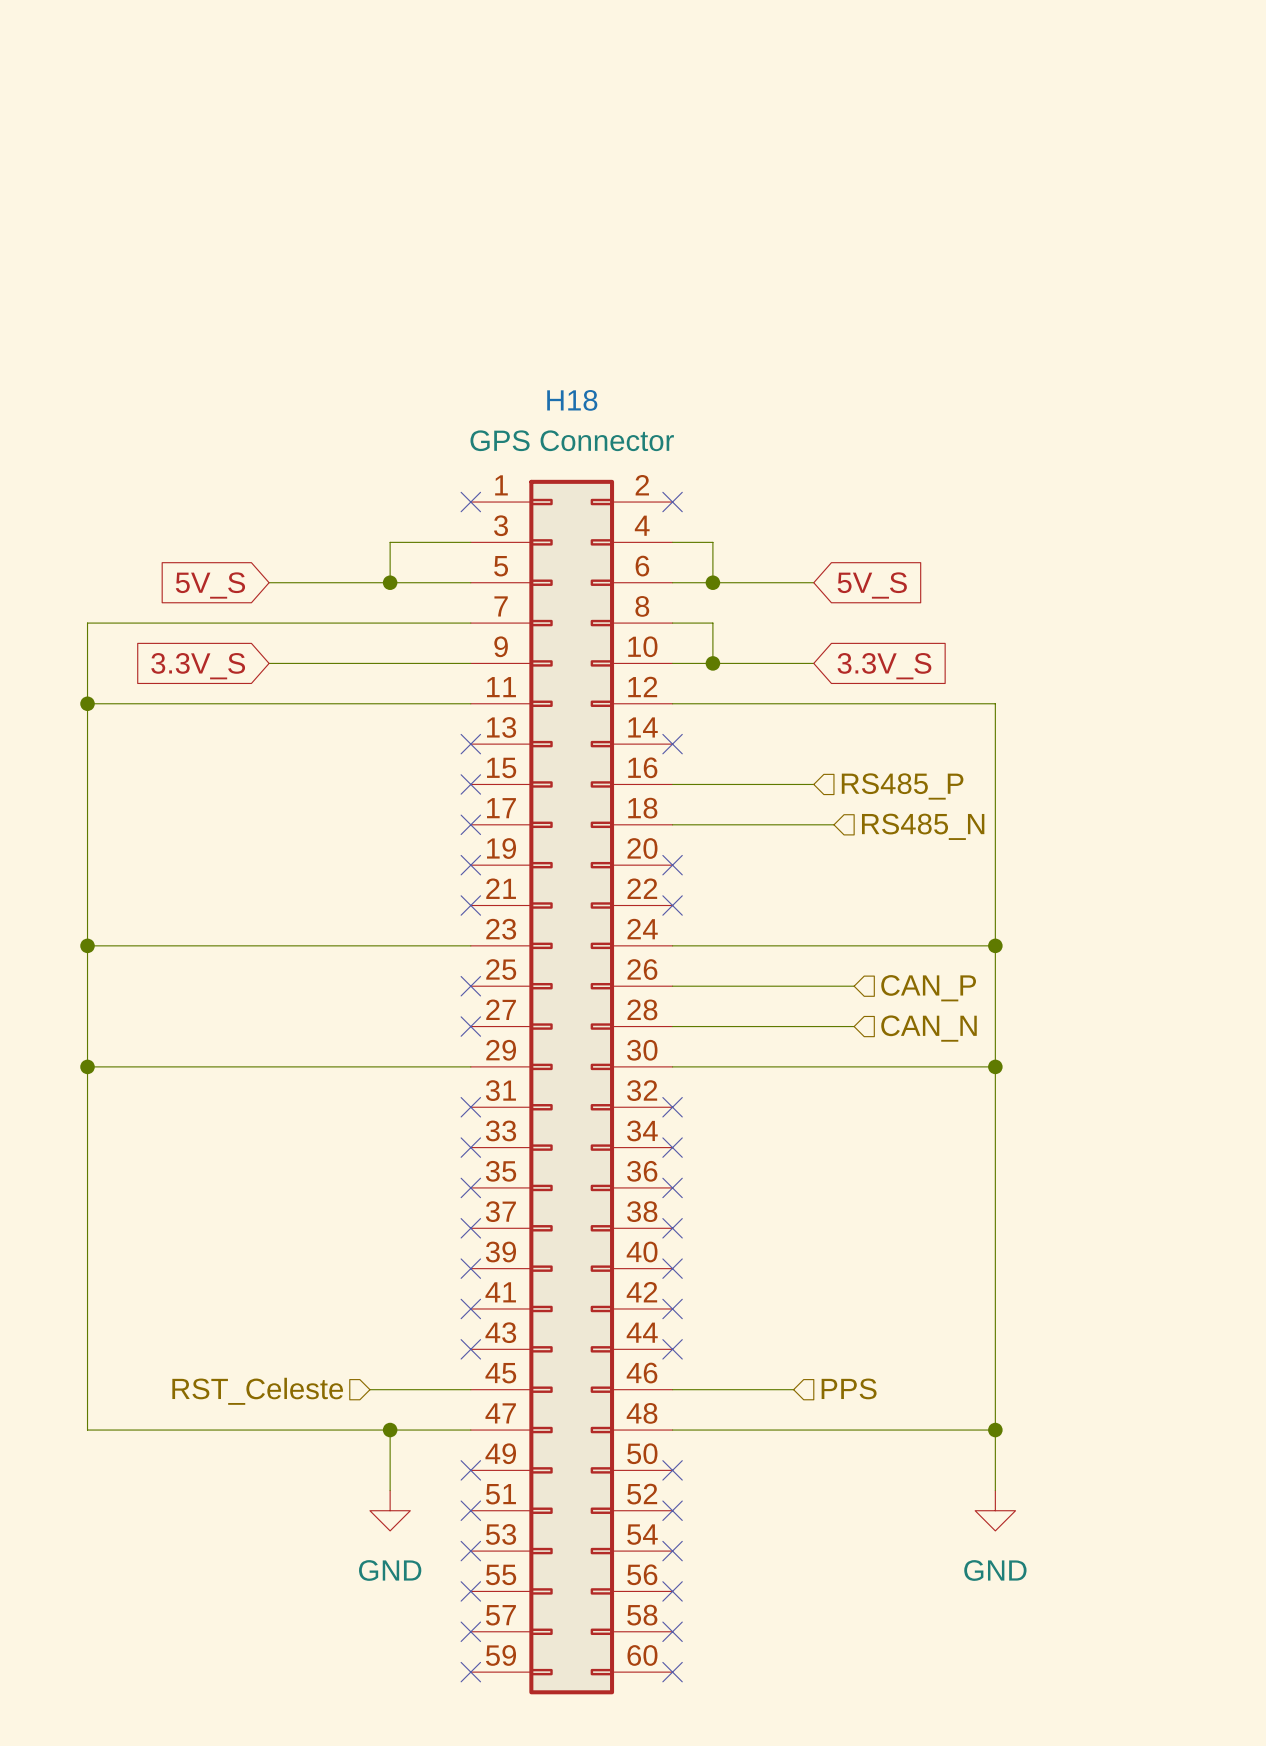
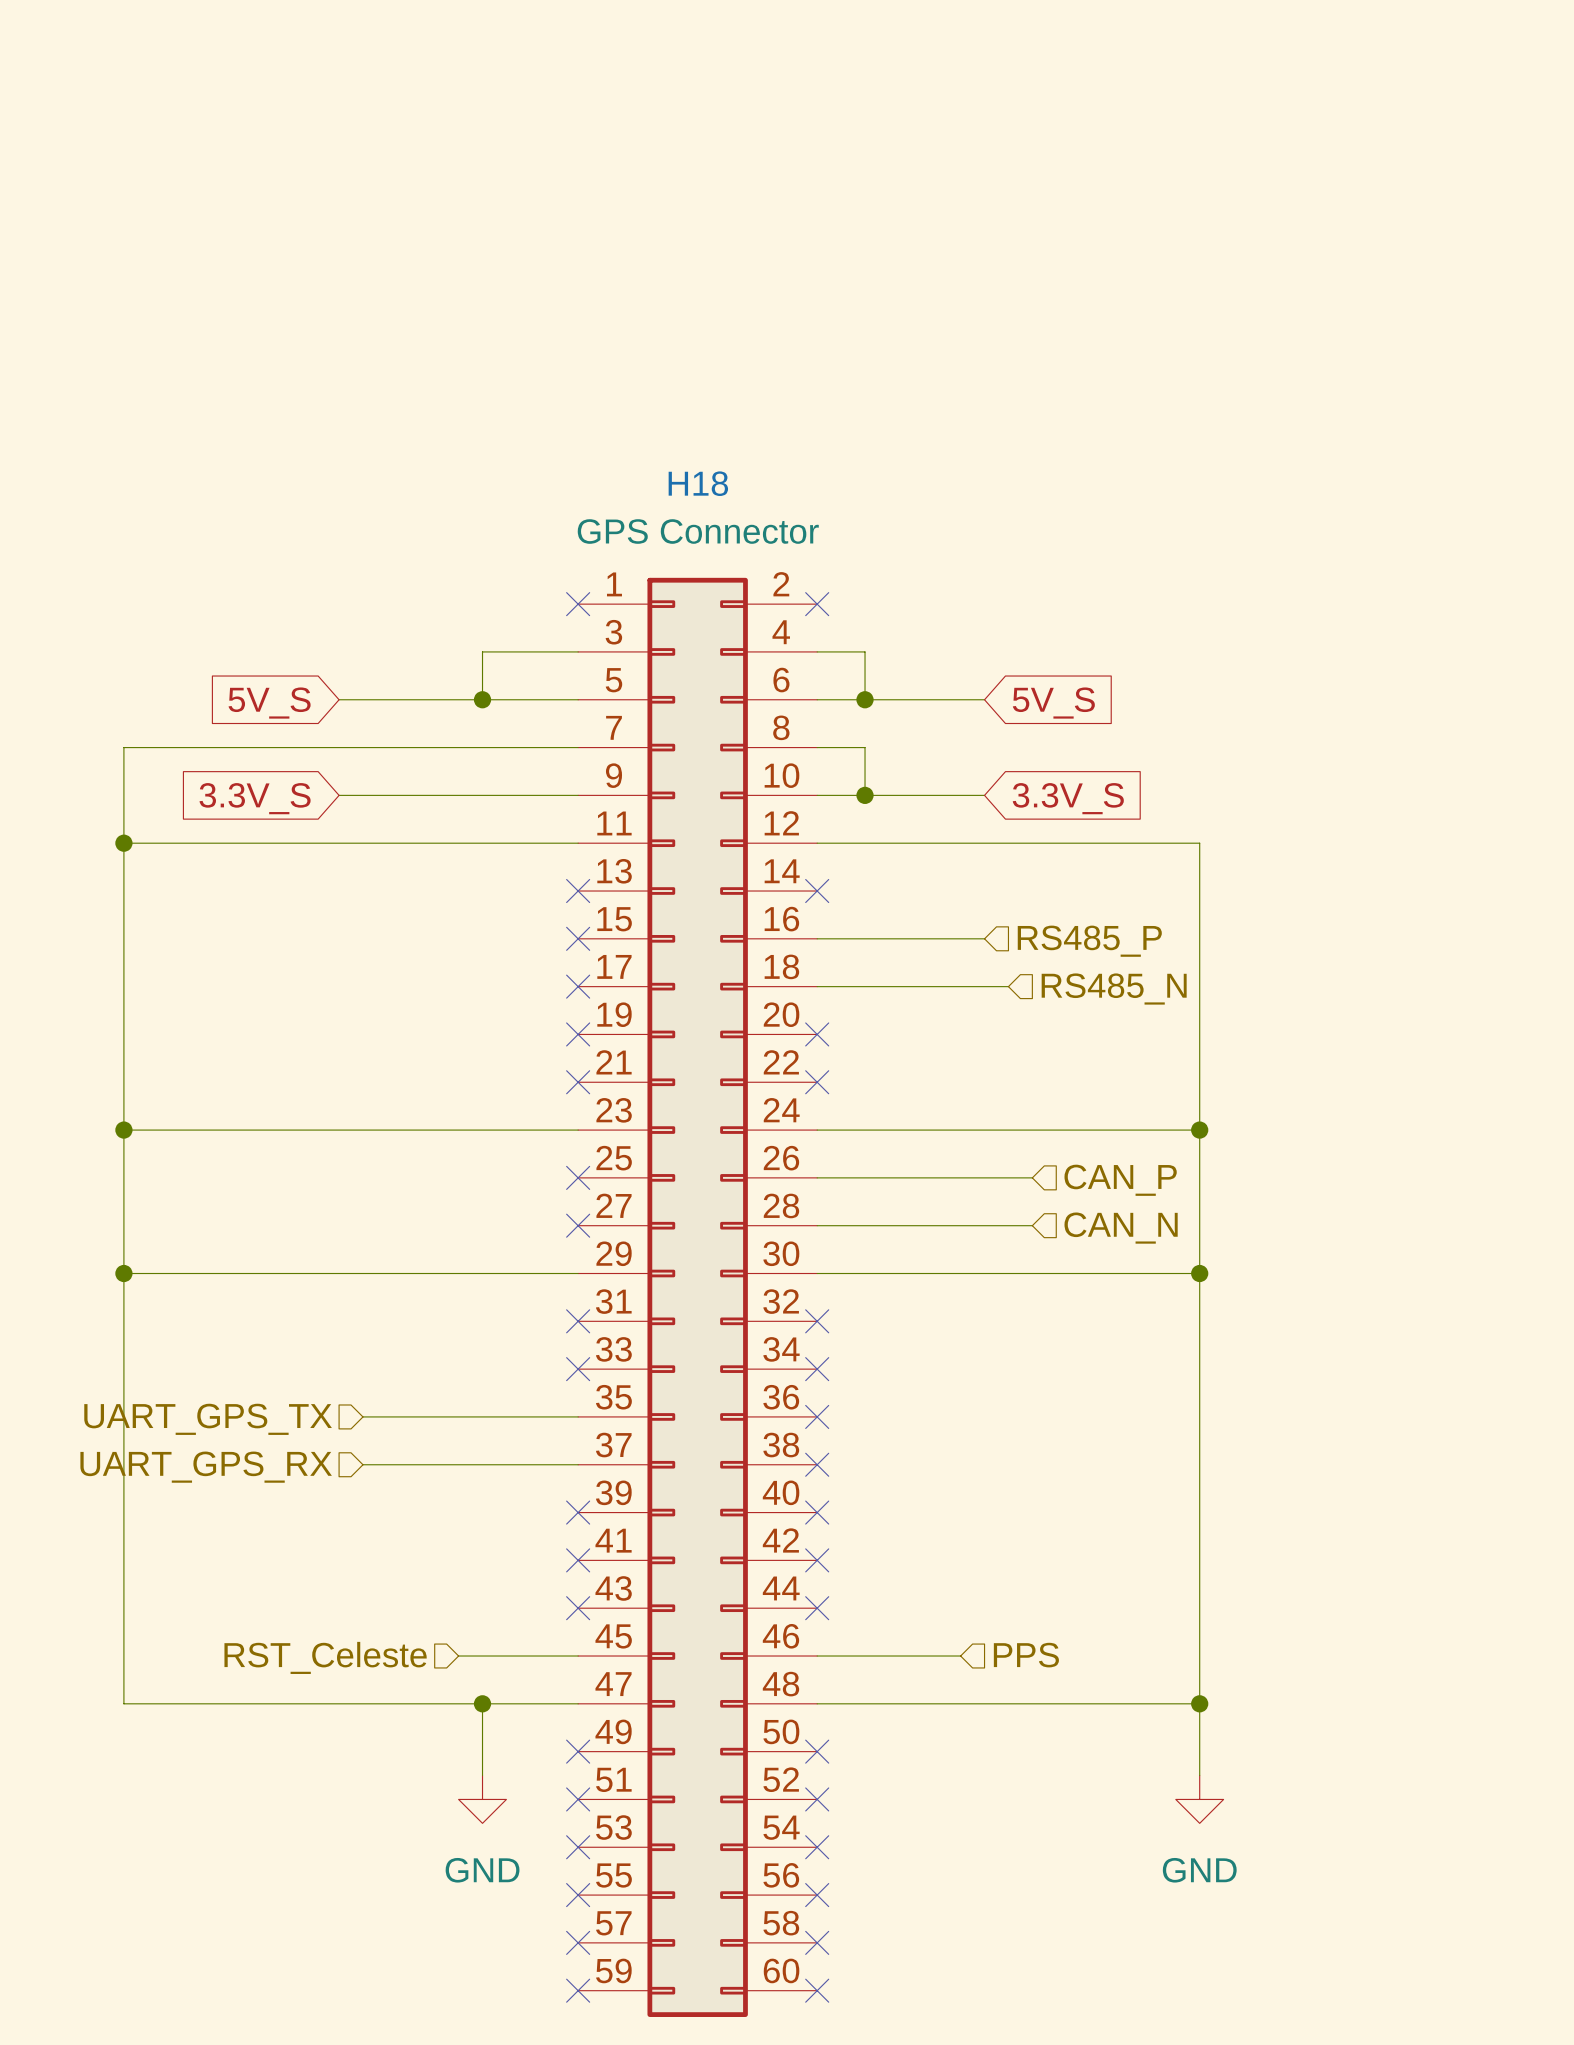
wire: none -> (362, 1416) (578, 1416)
no-connect mark: (470, 1187) -> none
hierarchical label: none -> UART_GPS_TX (208, 1419)
wire: none -> (362, 1464) (578, 1464)
no-connect mark: (470, 1228) -> none
hierarchical label: none -> UART_GPS_RX (206, 1467)

